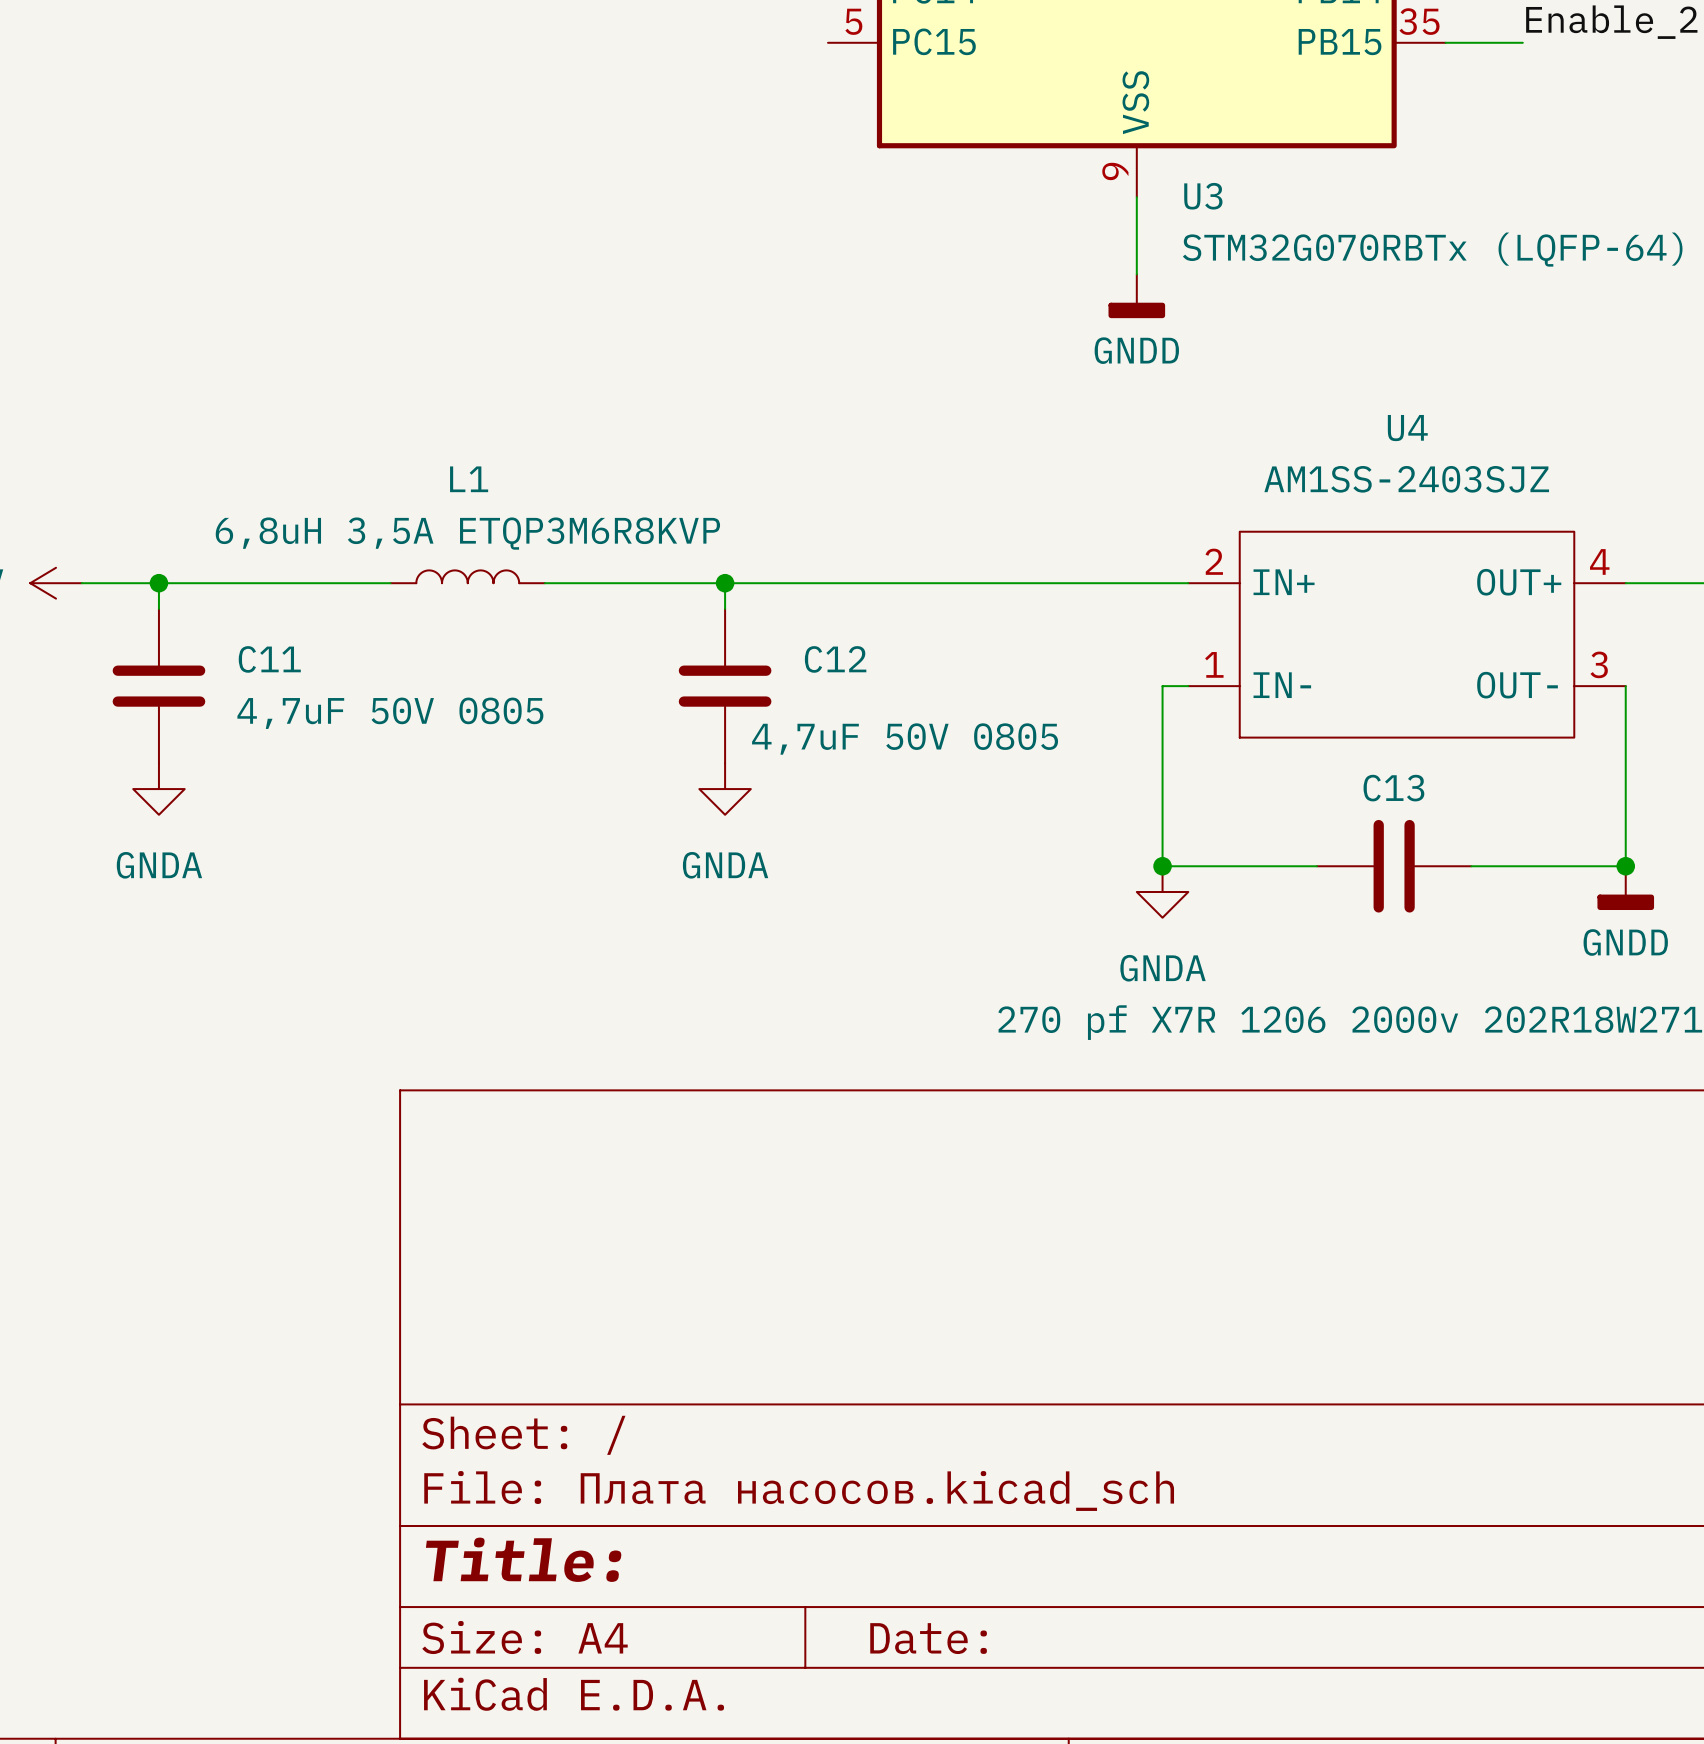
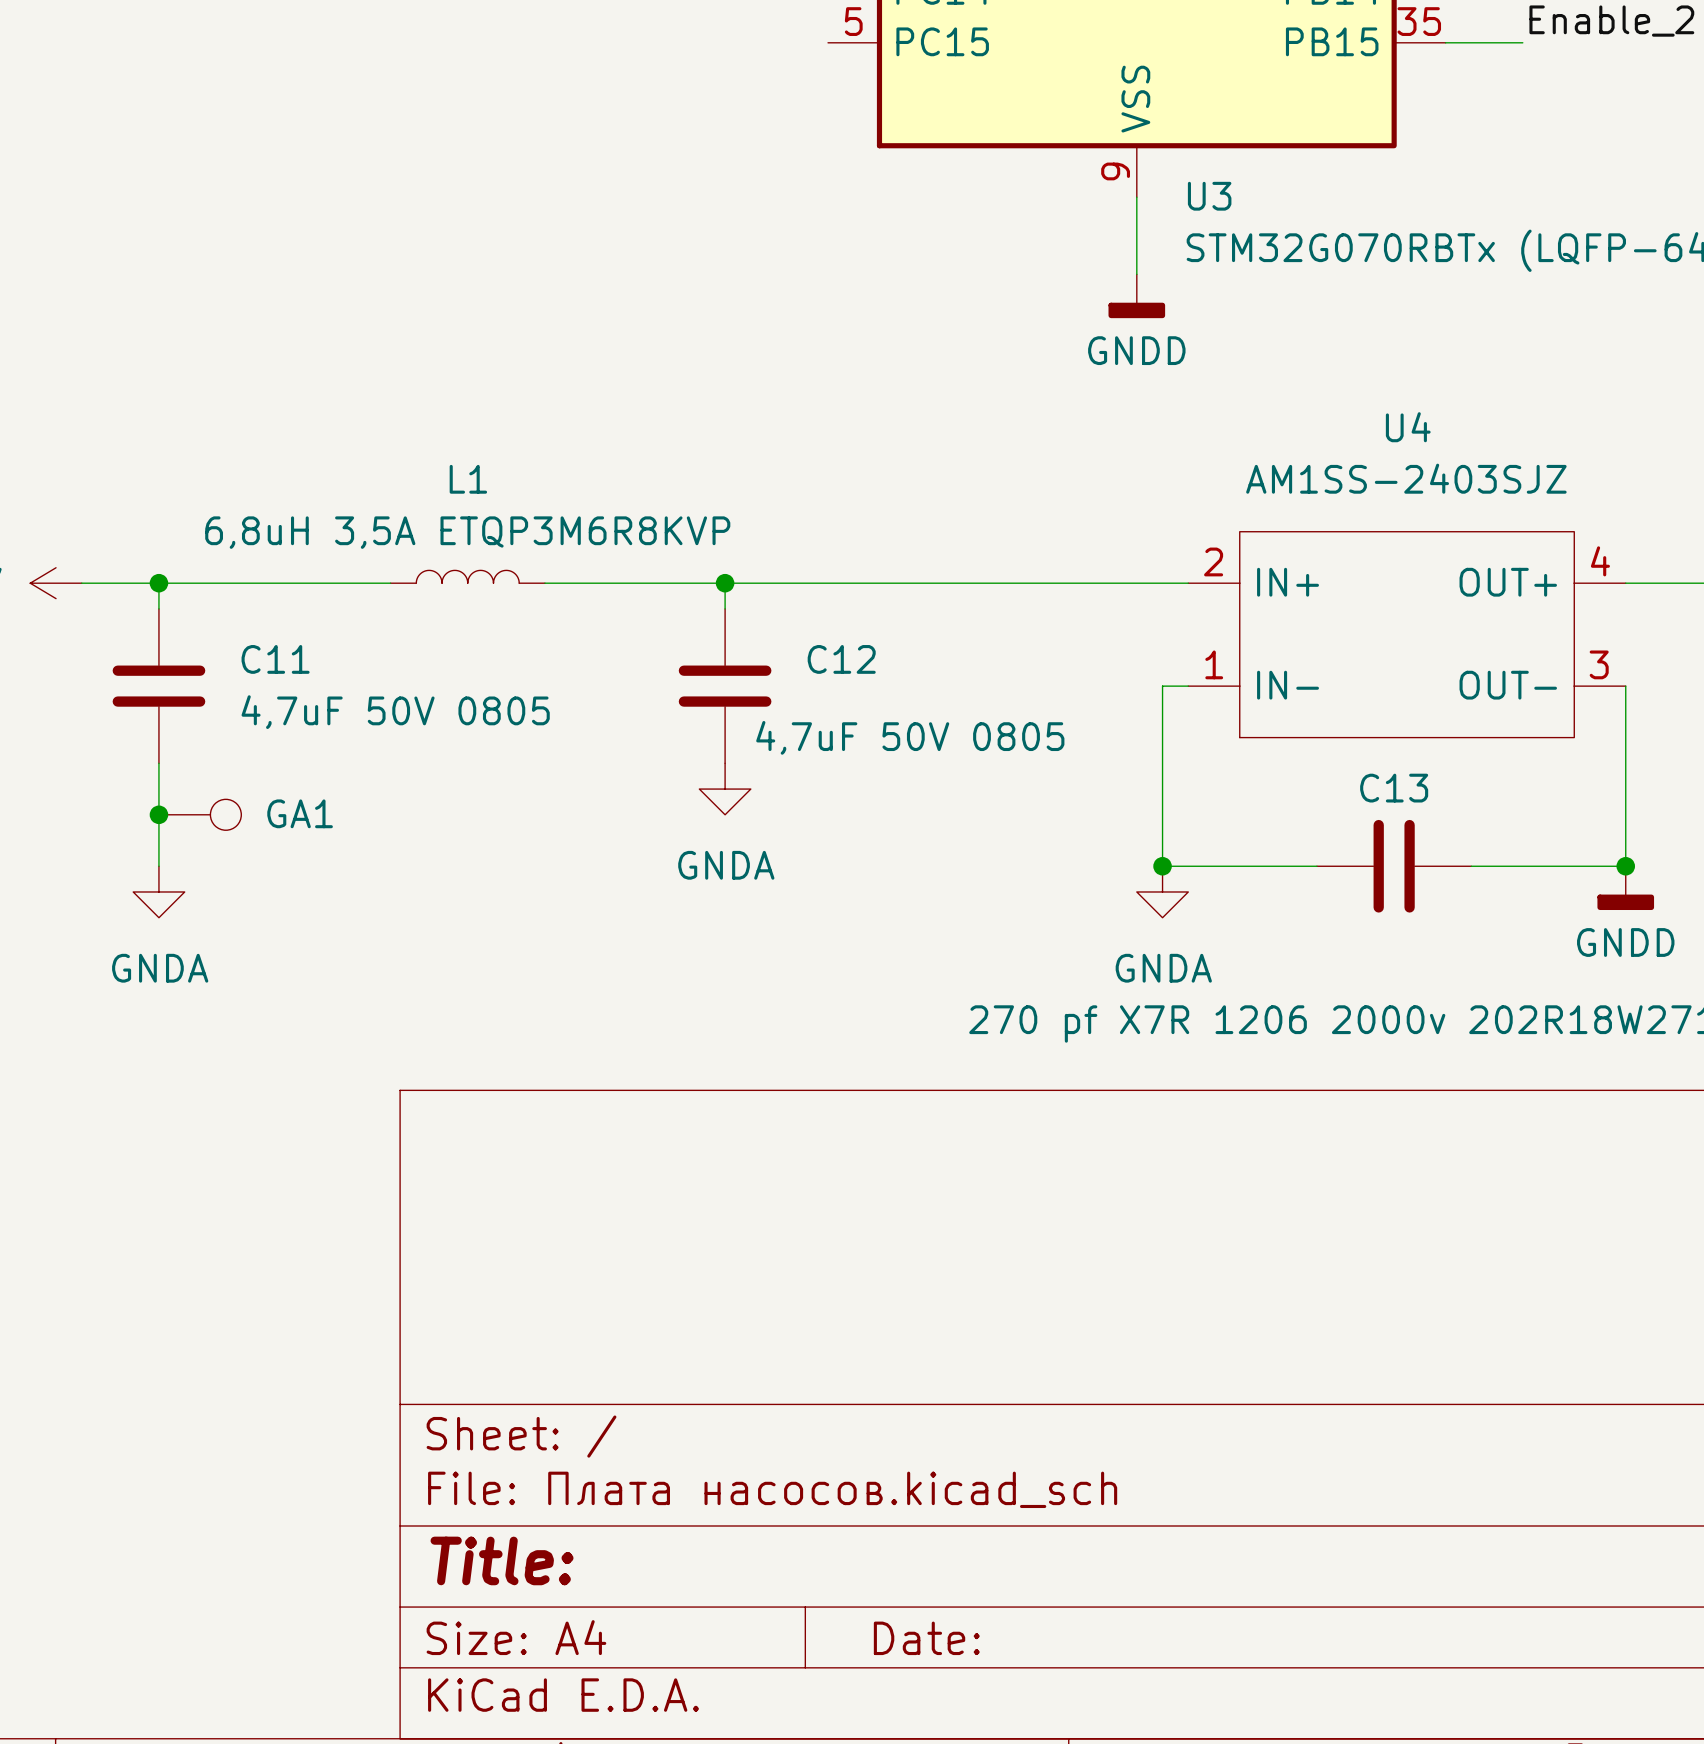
wire: none -> (158, 763) (158, 866)
power symbol position: GNDA (158, 789) -> GNDA (158, 891)
junction: none -> (158, 814)
GA1: none -> (200, 814)

